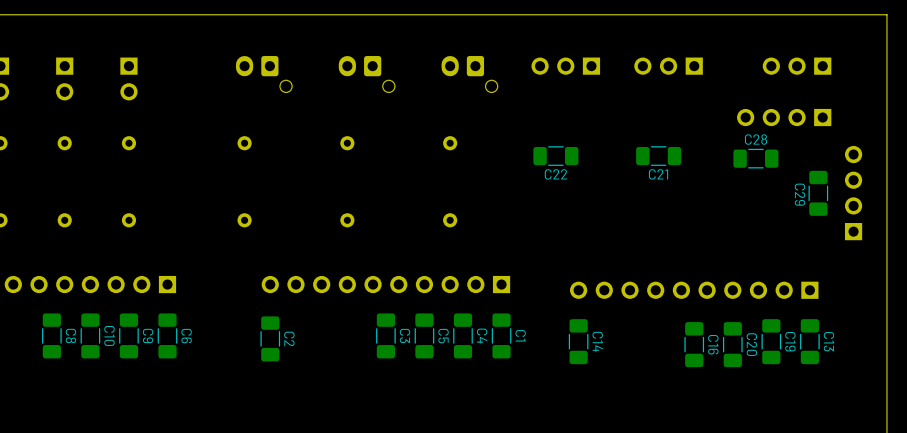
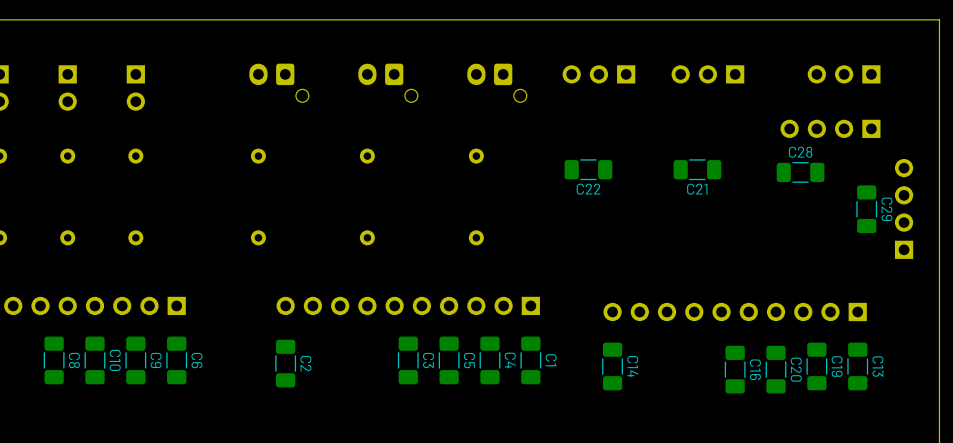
C29 name position: C29 (799, 194) -> C29 (886, 209)

